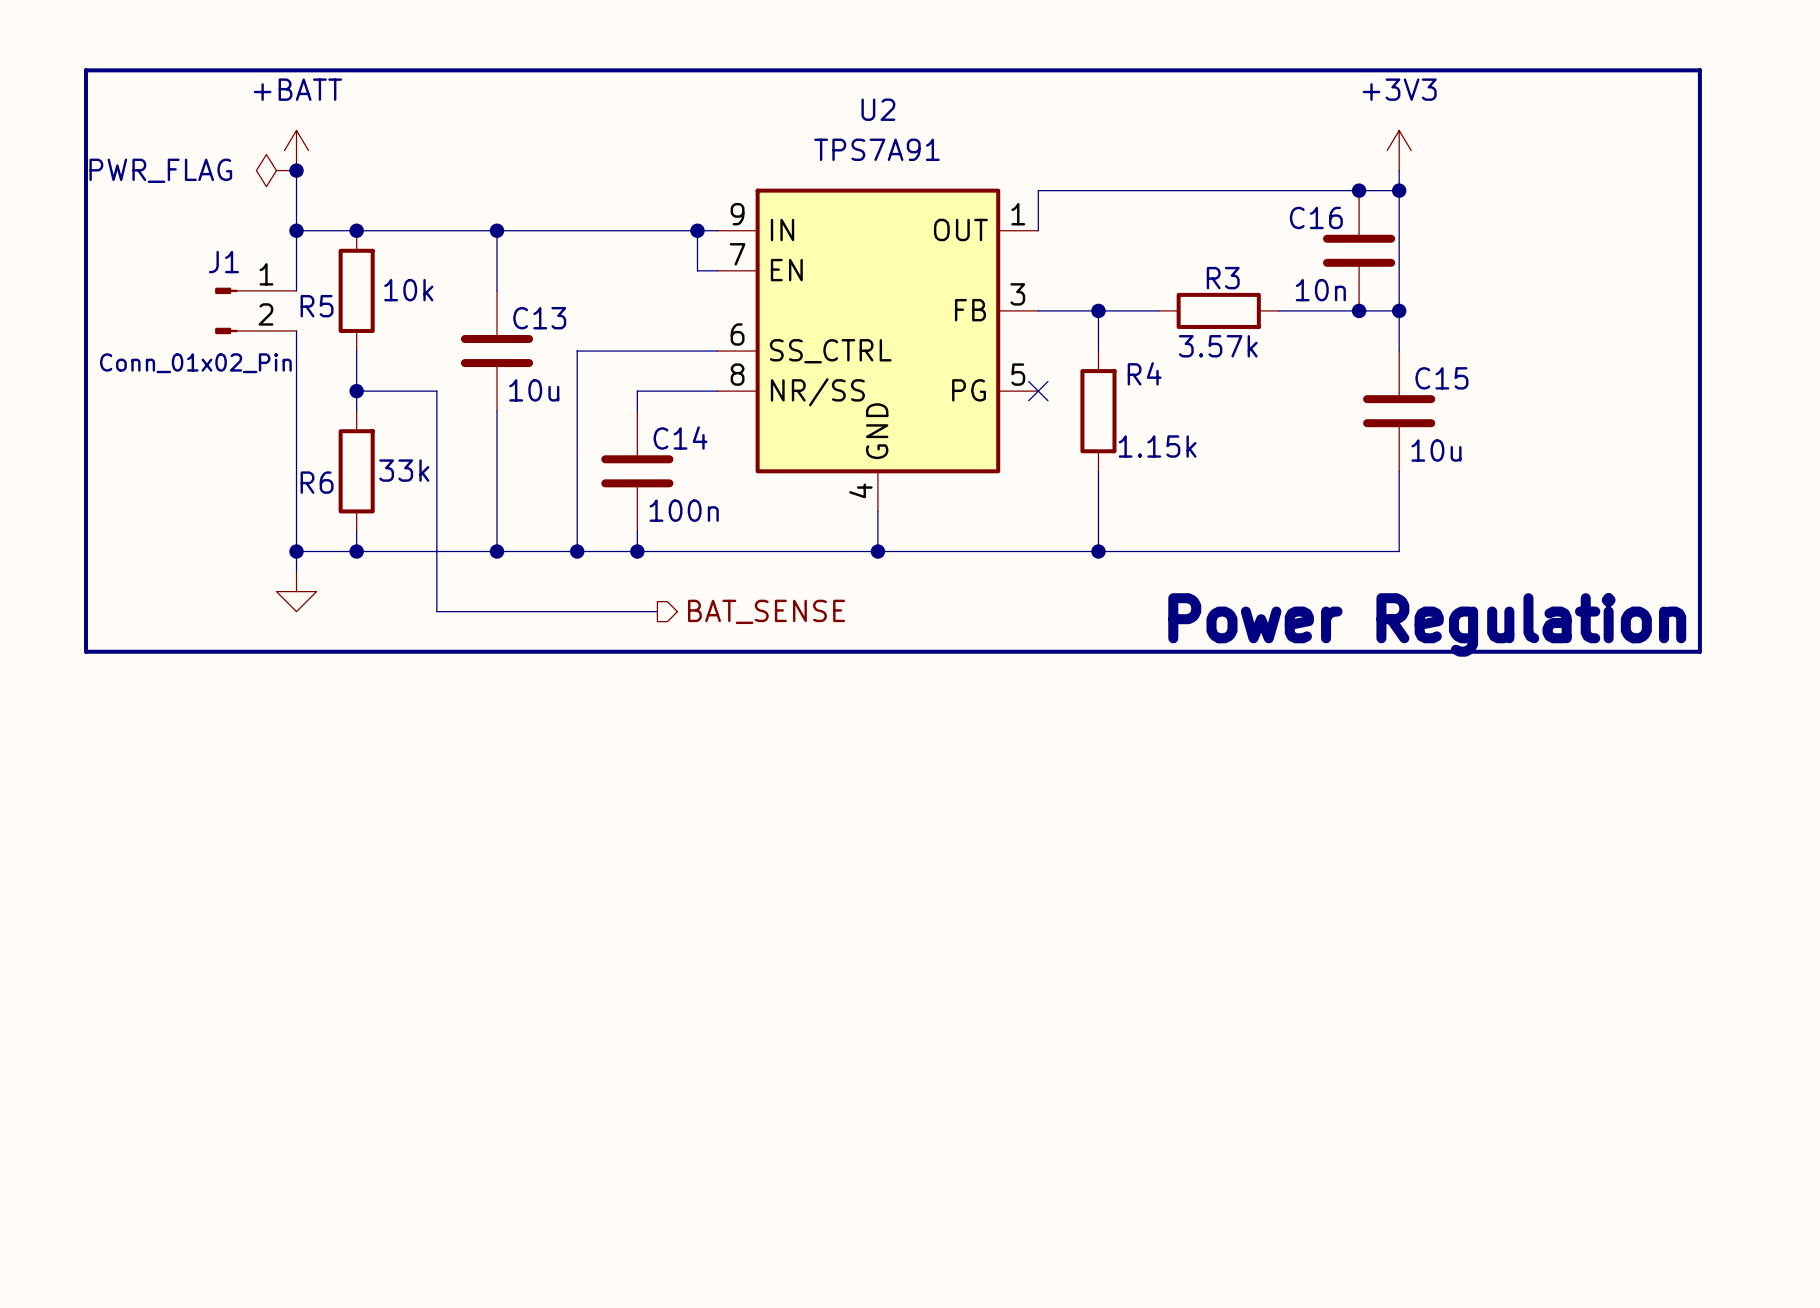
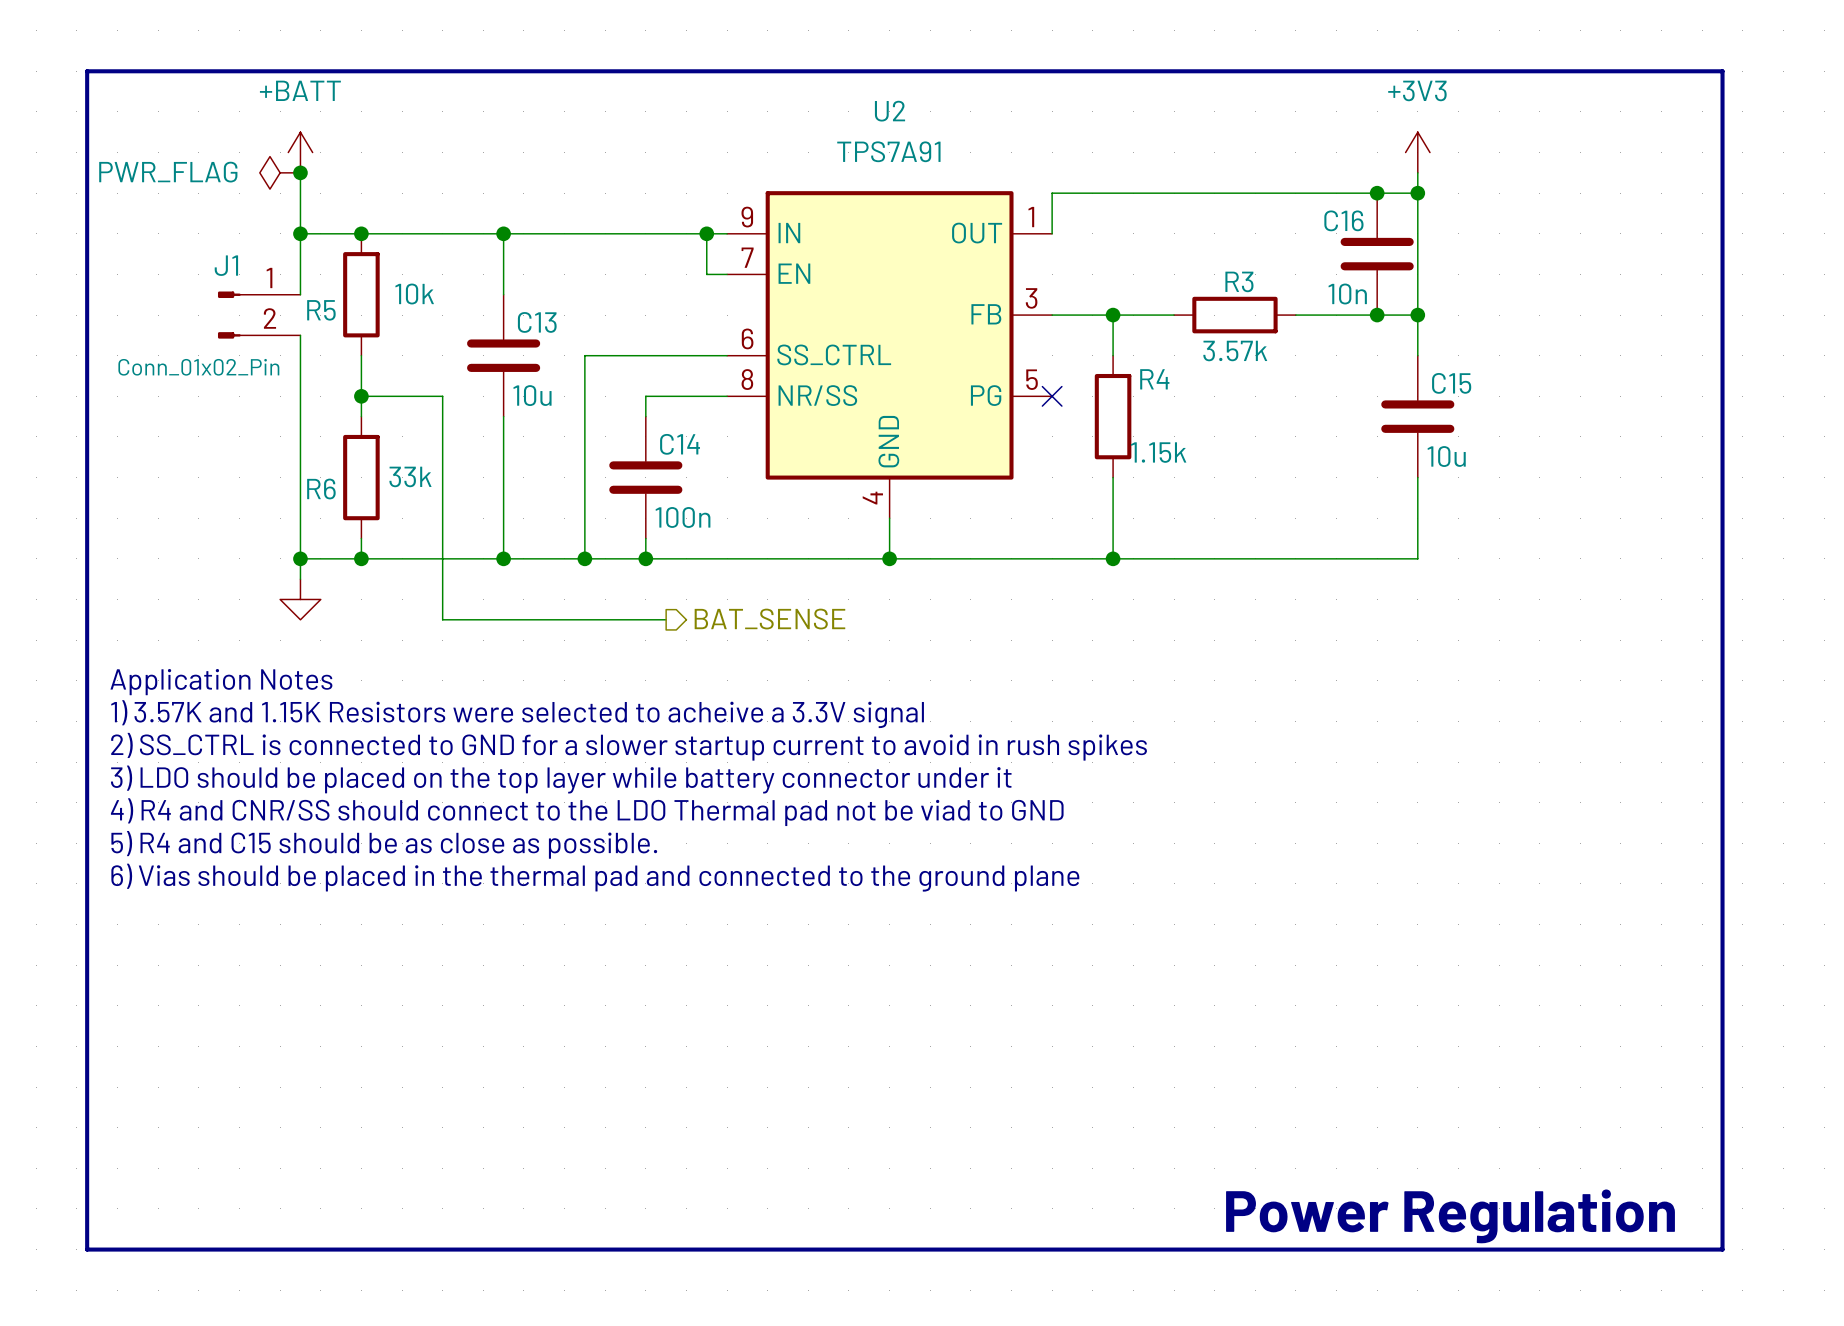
text: Power Regulation (1427, 624) -> none
line: (86, 651) (1699, 651) -> (87, 660) (87, 1249) (1722, 1249) (1722, 660)
text: none -> Application Notes (221, 682)
text: none -> 1) 3.57K and 1.15K Resistors were selected to acheive a 3.3V signal (517, 714)
text: none -> 2) SS_CTRL is connected to GND for a slower startup current to avoid in rush spikes (629, 746)
text: none -> 3) LDO should be placed on the top layer while battery connector under it (561, 779)
text: none -> 4) R4 and CNR/SS should connect to the LDO Thermal pad not be viad to GND (587, 812)
text: none -> 5) R4 and C15 should be as close as possible. (384, 844)
text: none -> 6) Vias should be placed in the thermal pad and connected to the ground plane (595, 877)
text: none -> Power Regulation (1450, 1216)

